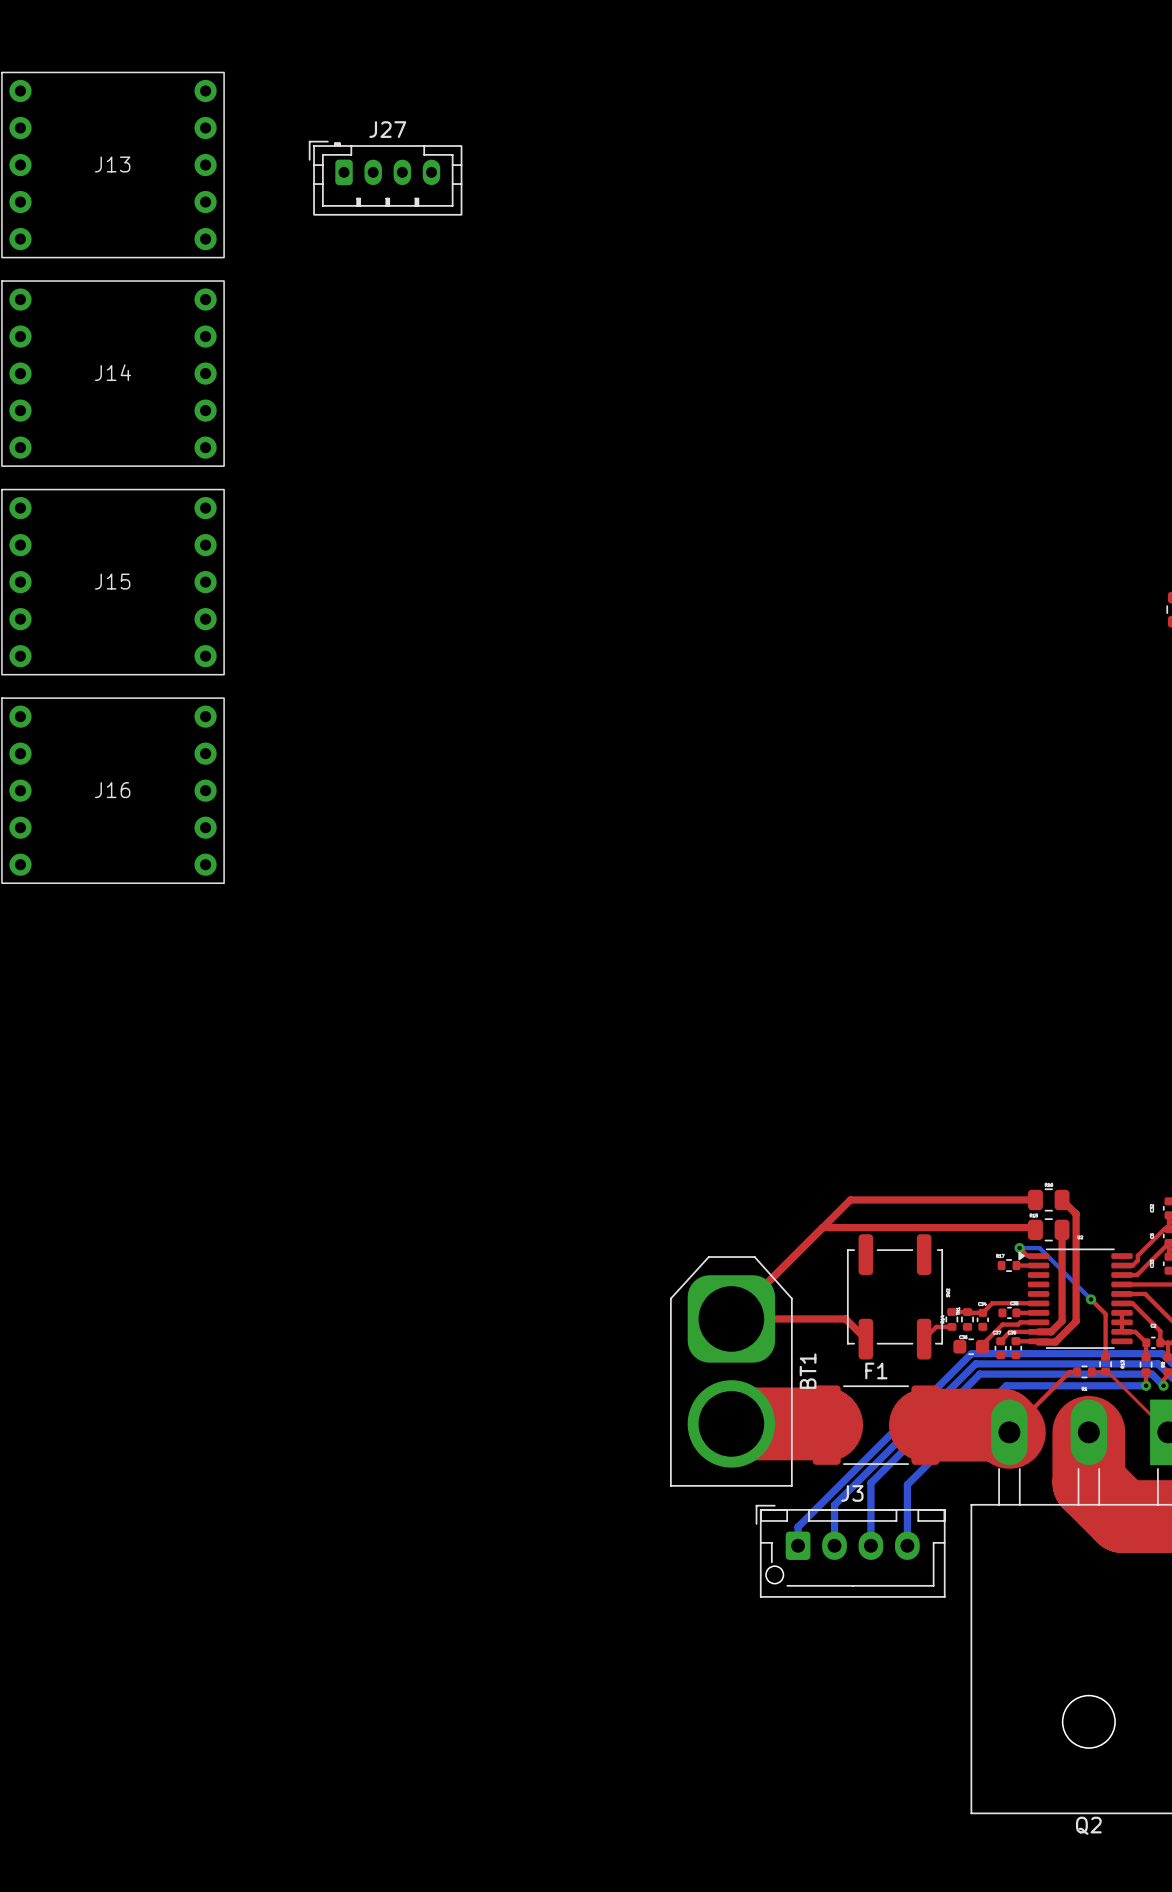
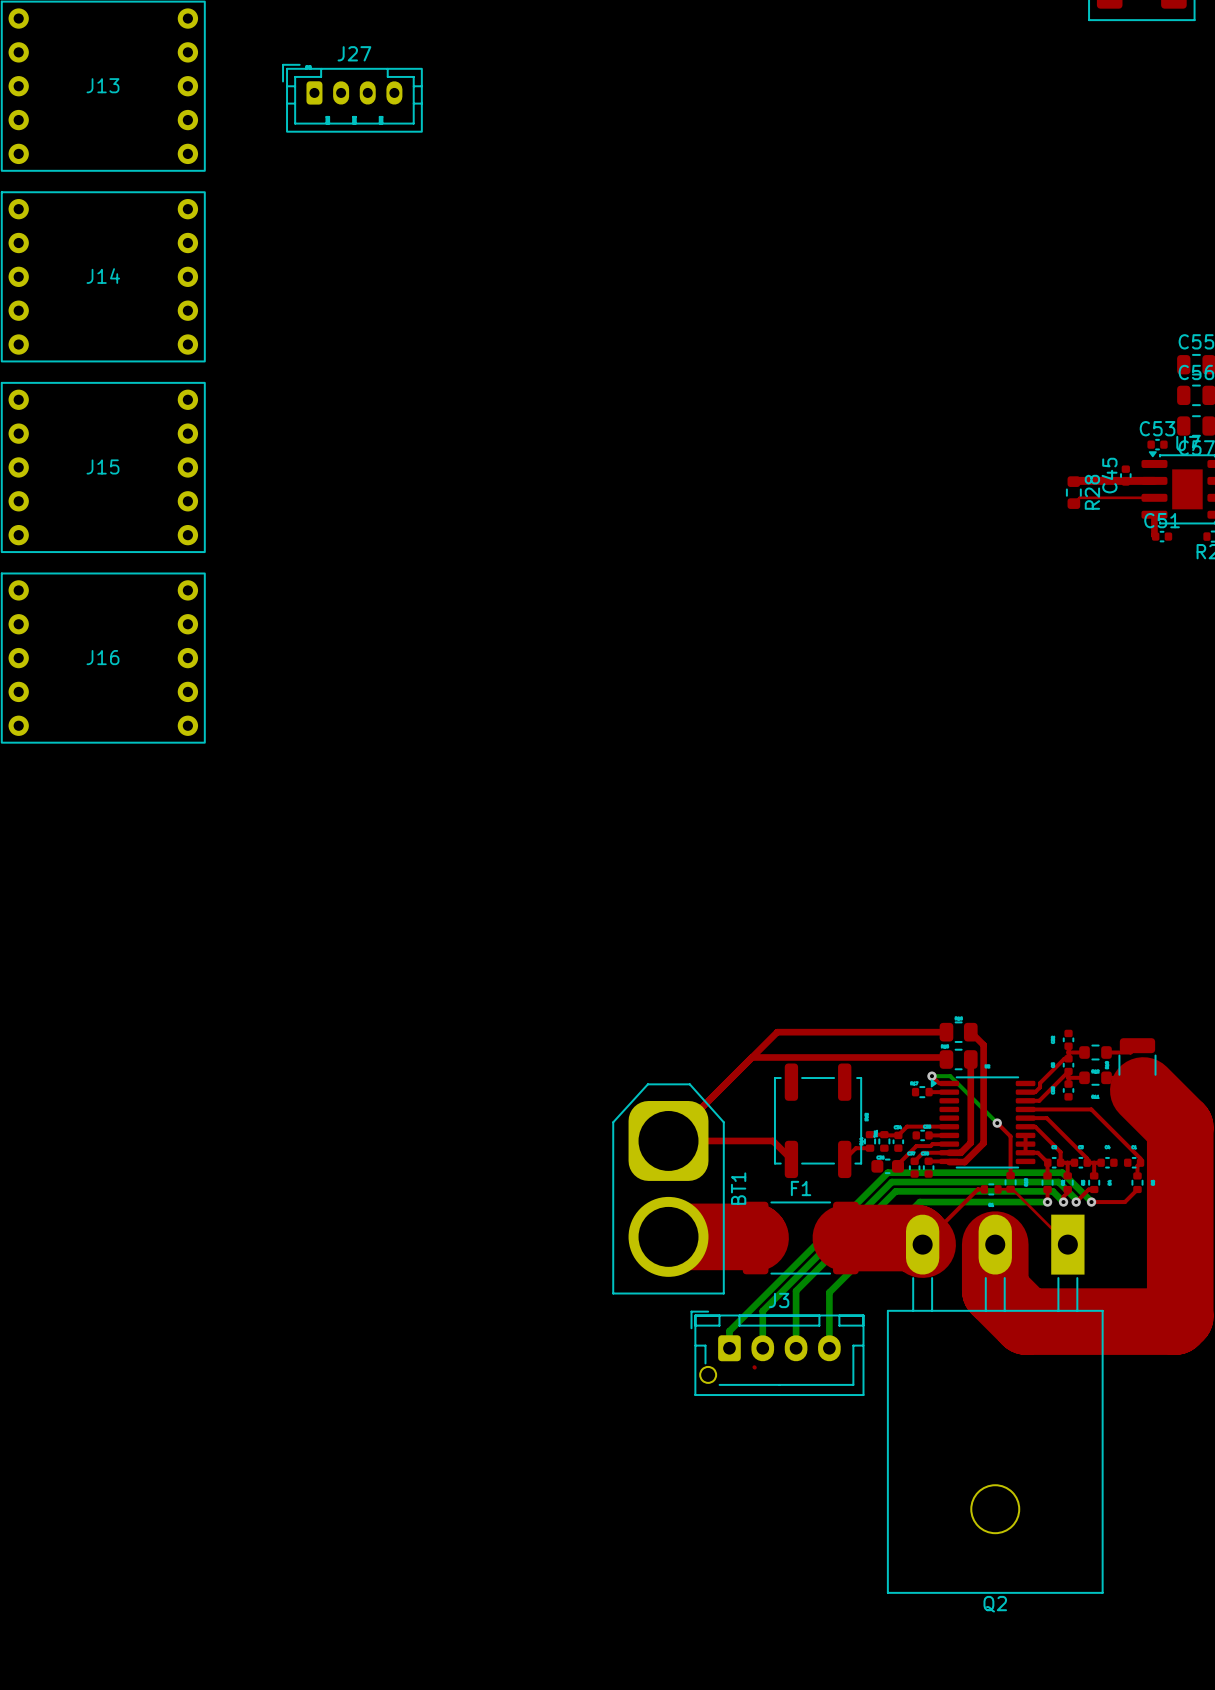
top track: none -> (754, 1367) (754, 1367)

